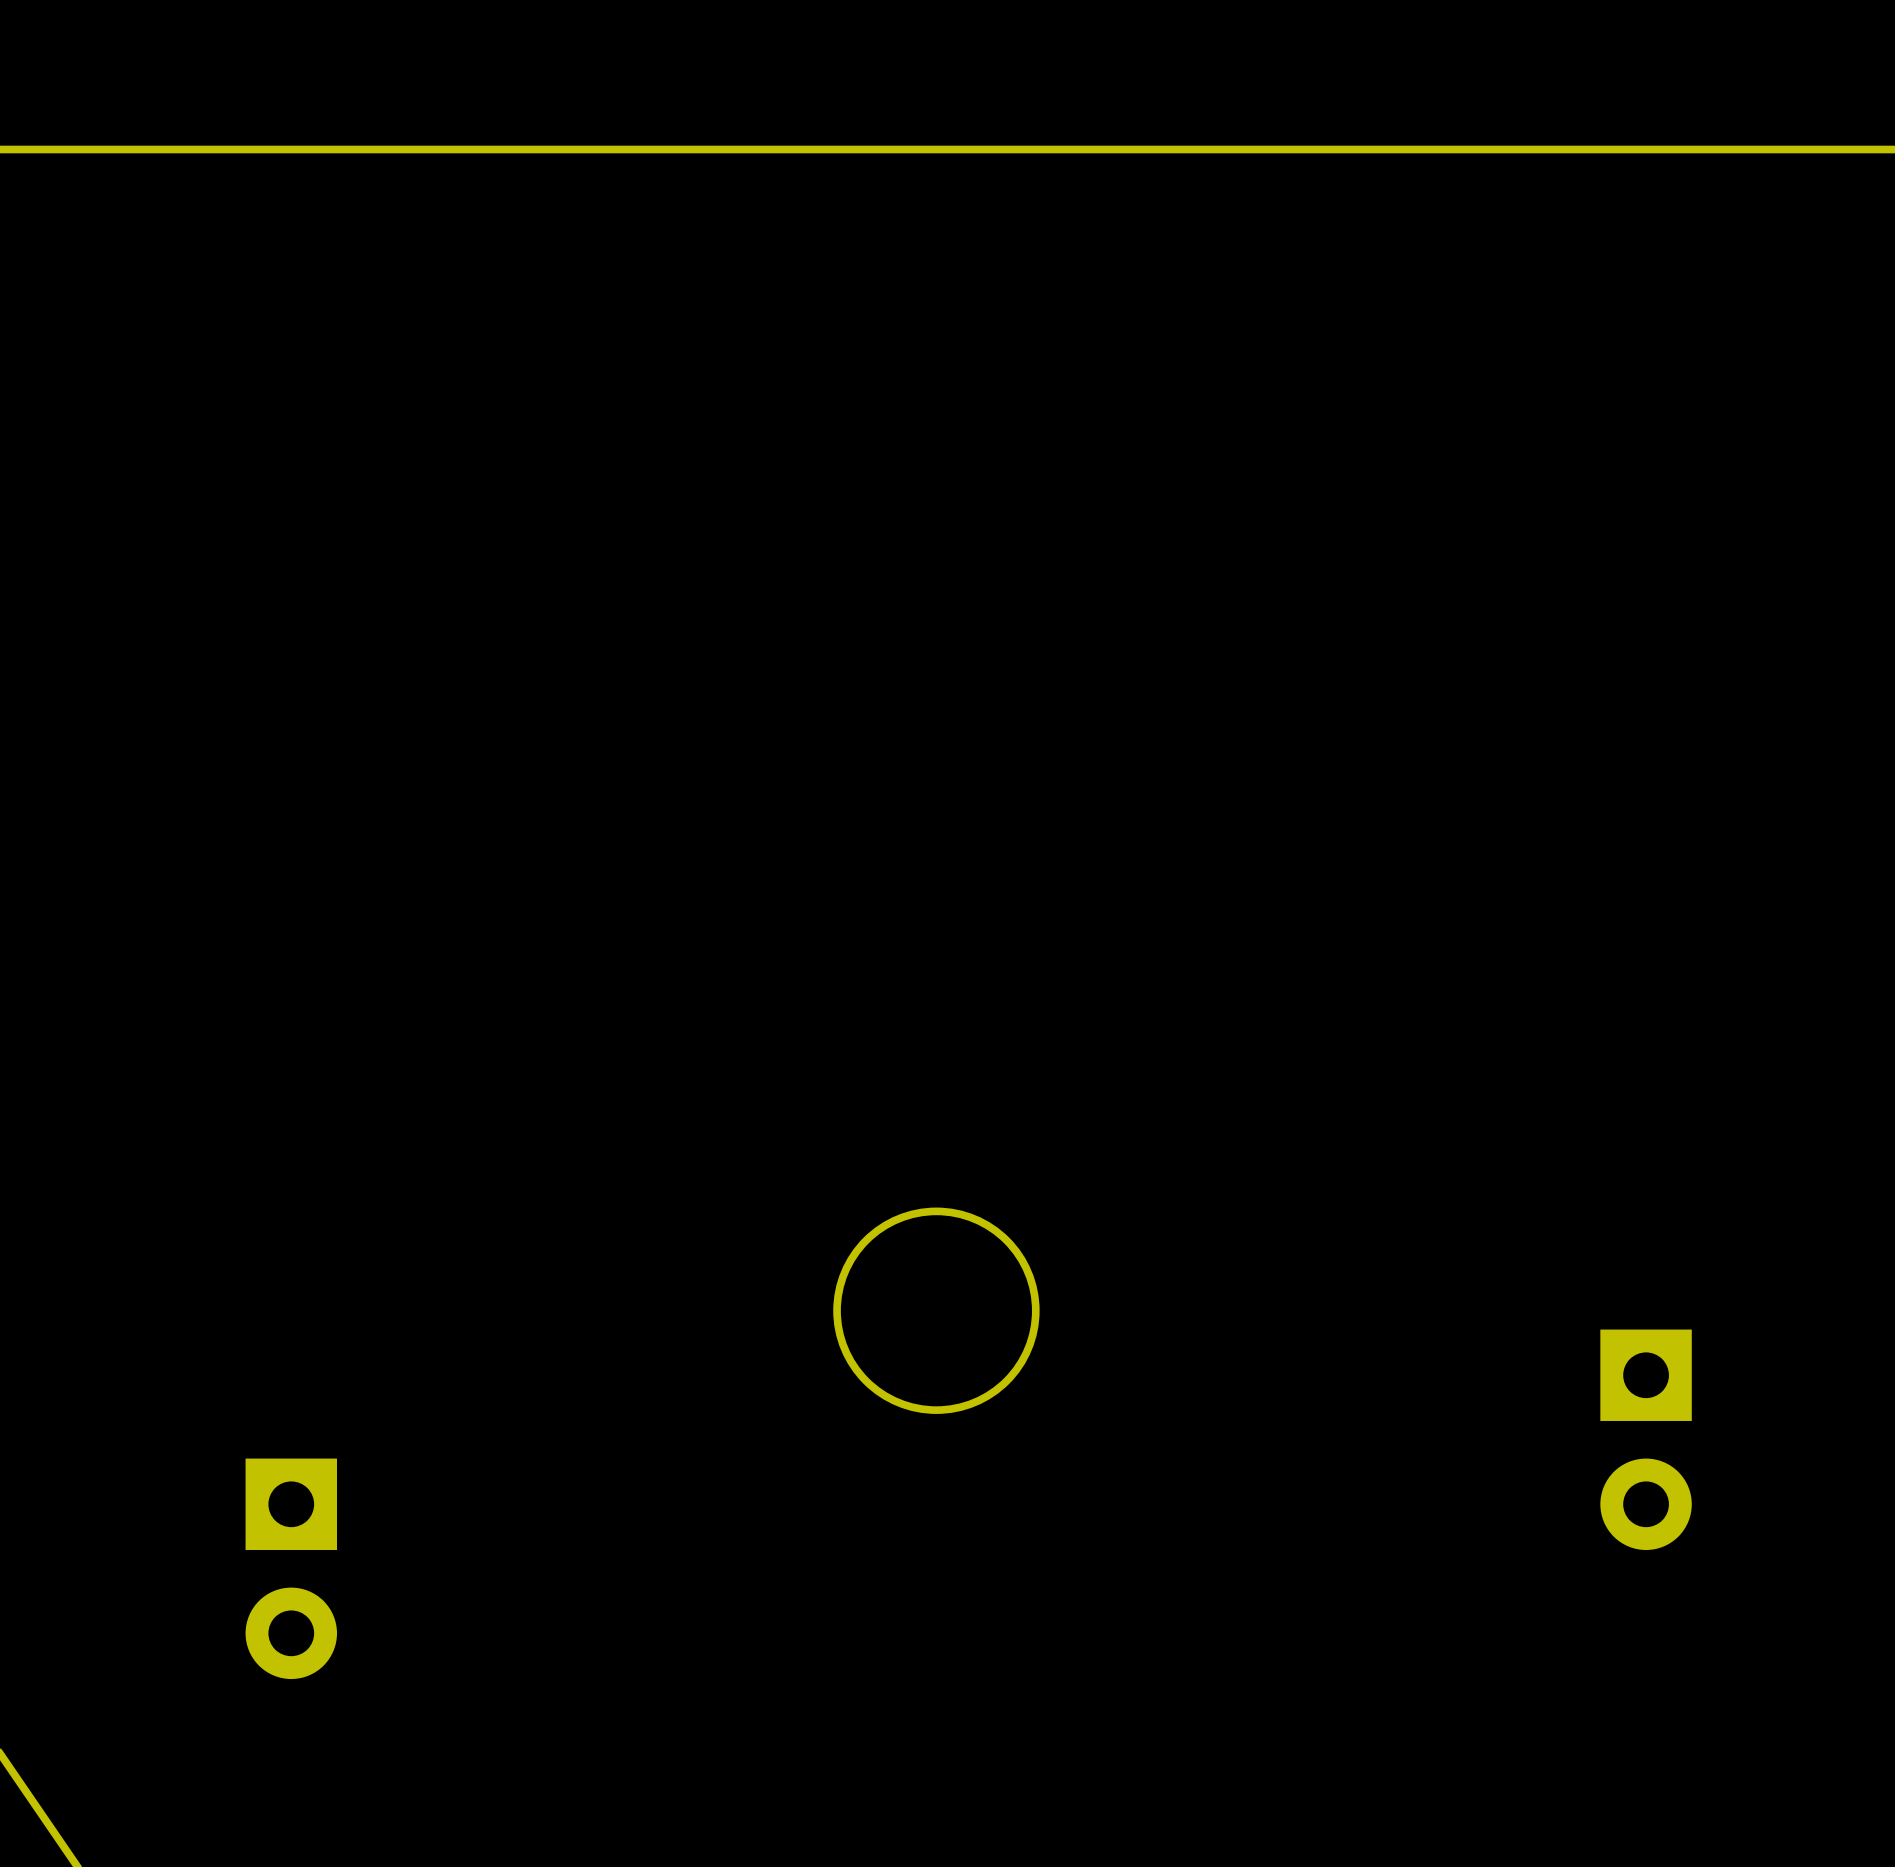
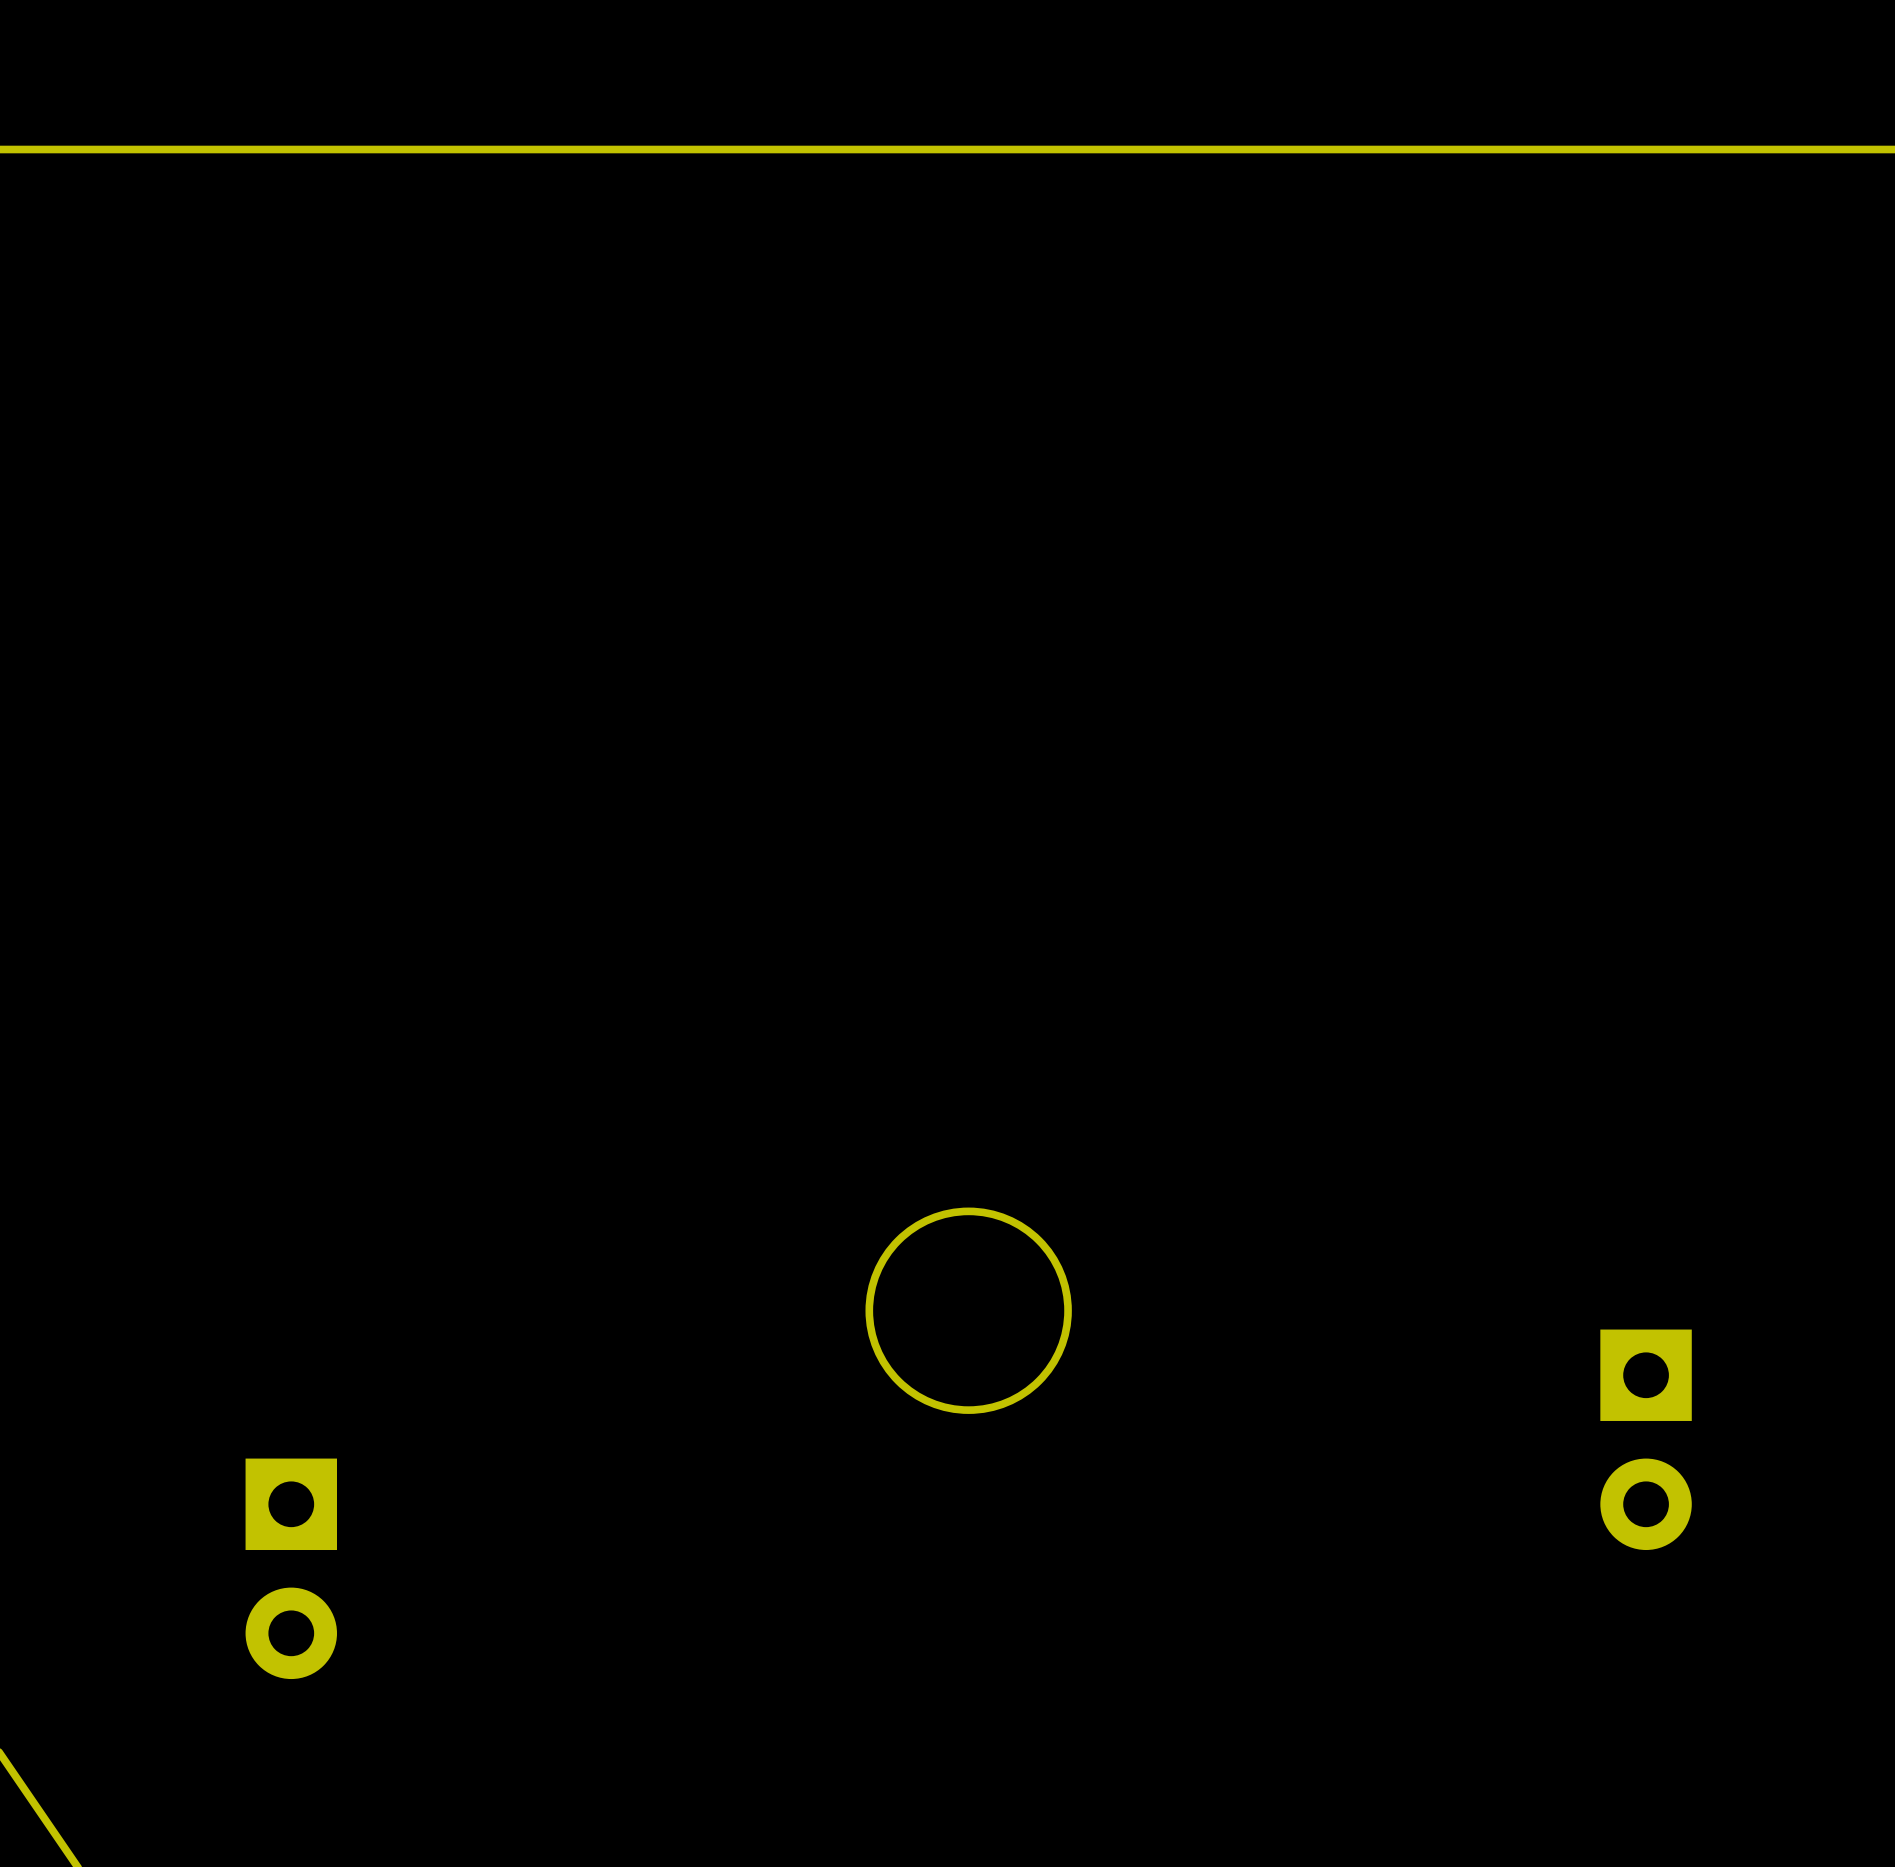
round board edge position: (936, 1310) -> (968, 1310)

